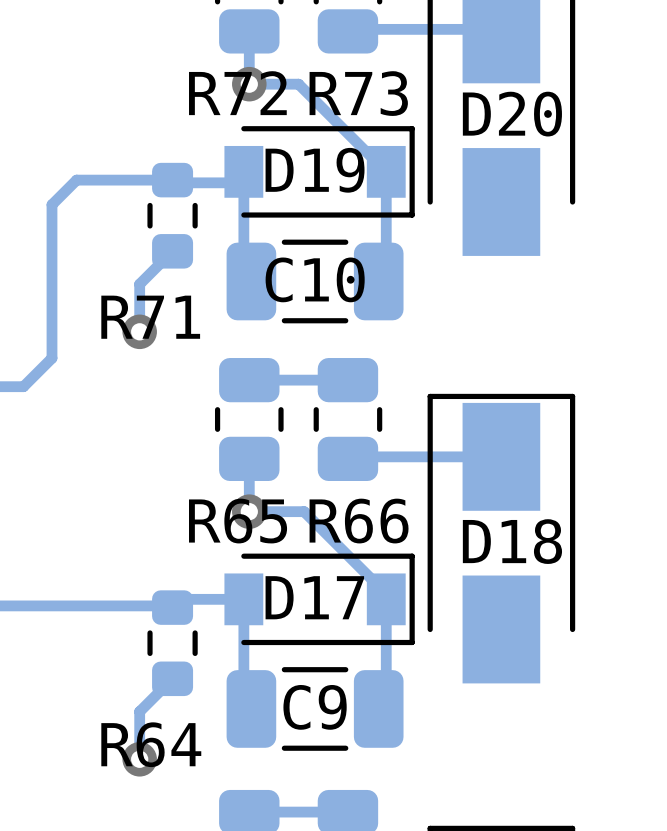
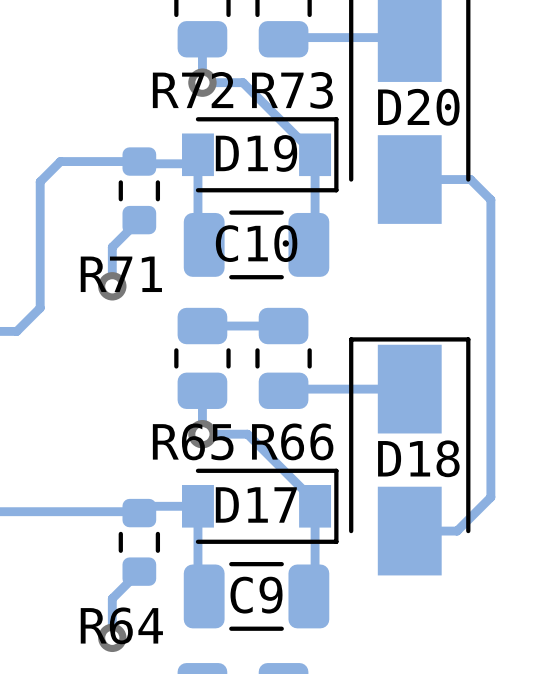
track: none -> (409, 179) (470, 179) (490, 199) (490, 497) (457, 531) (409, 531)

